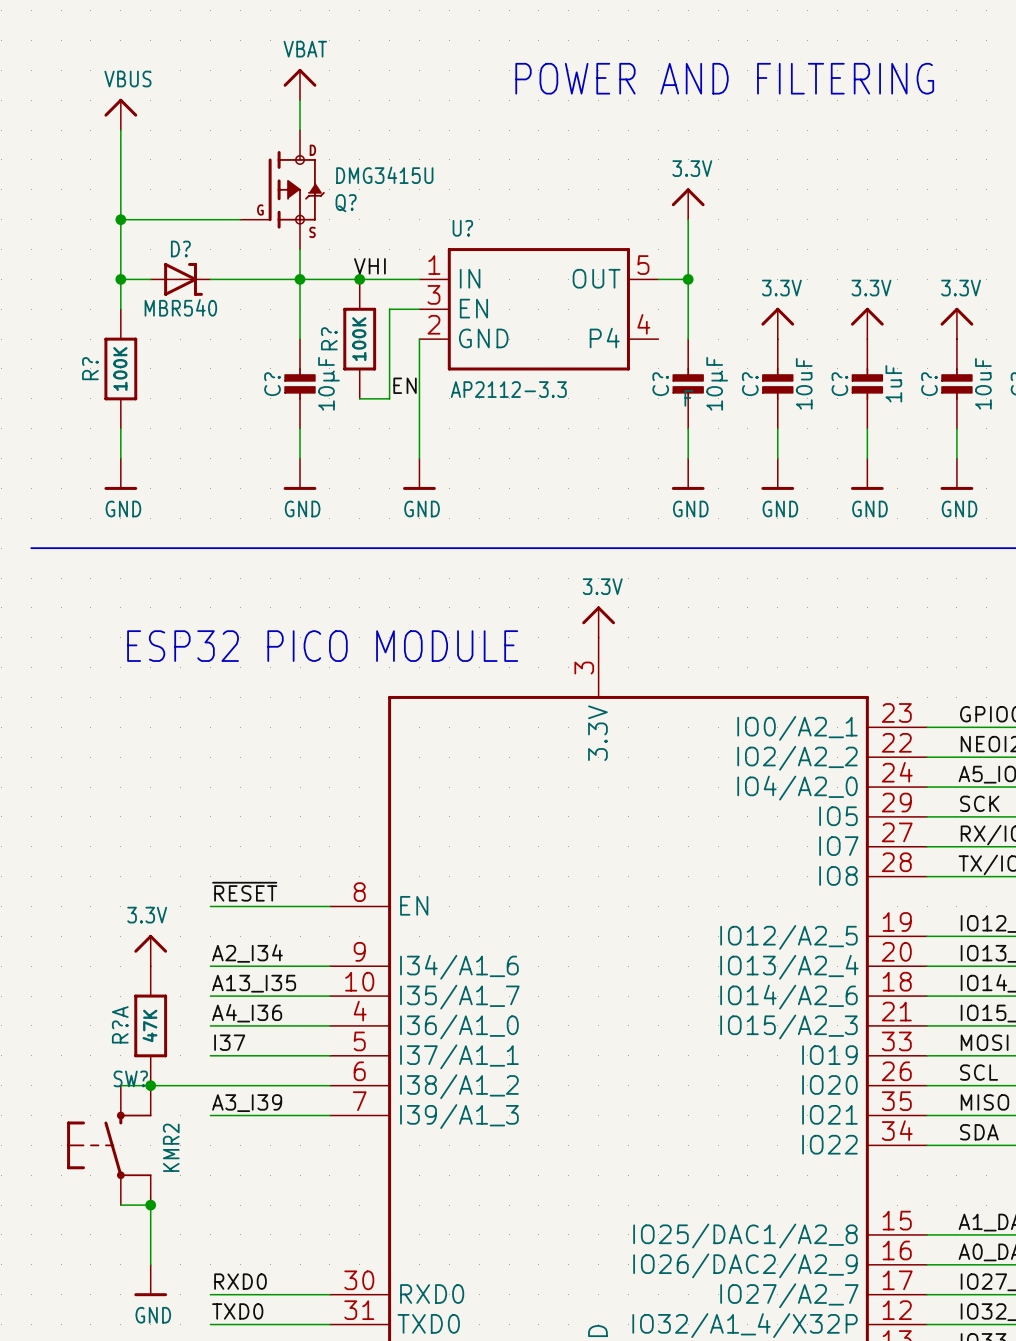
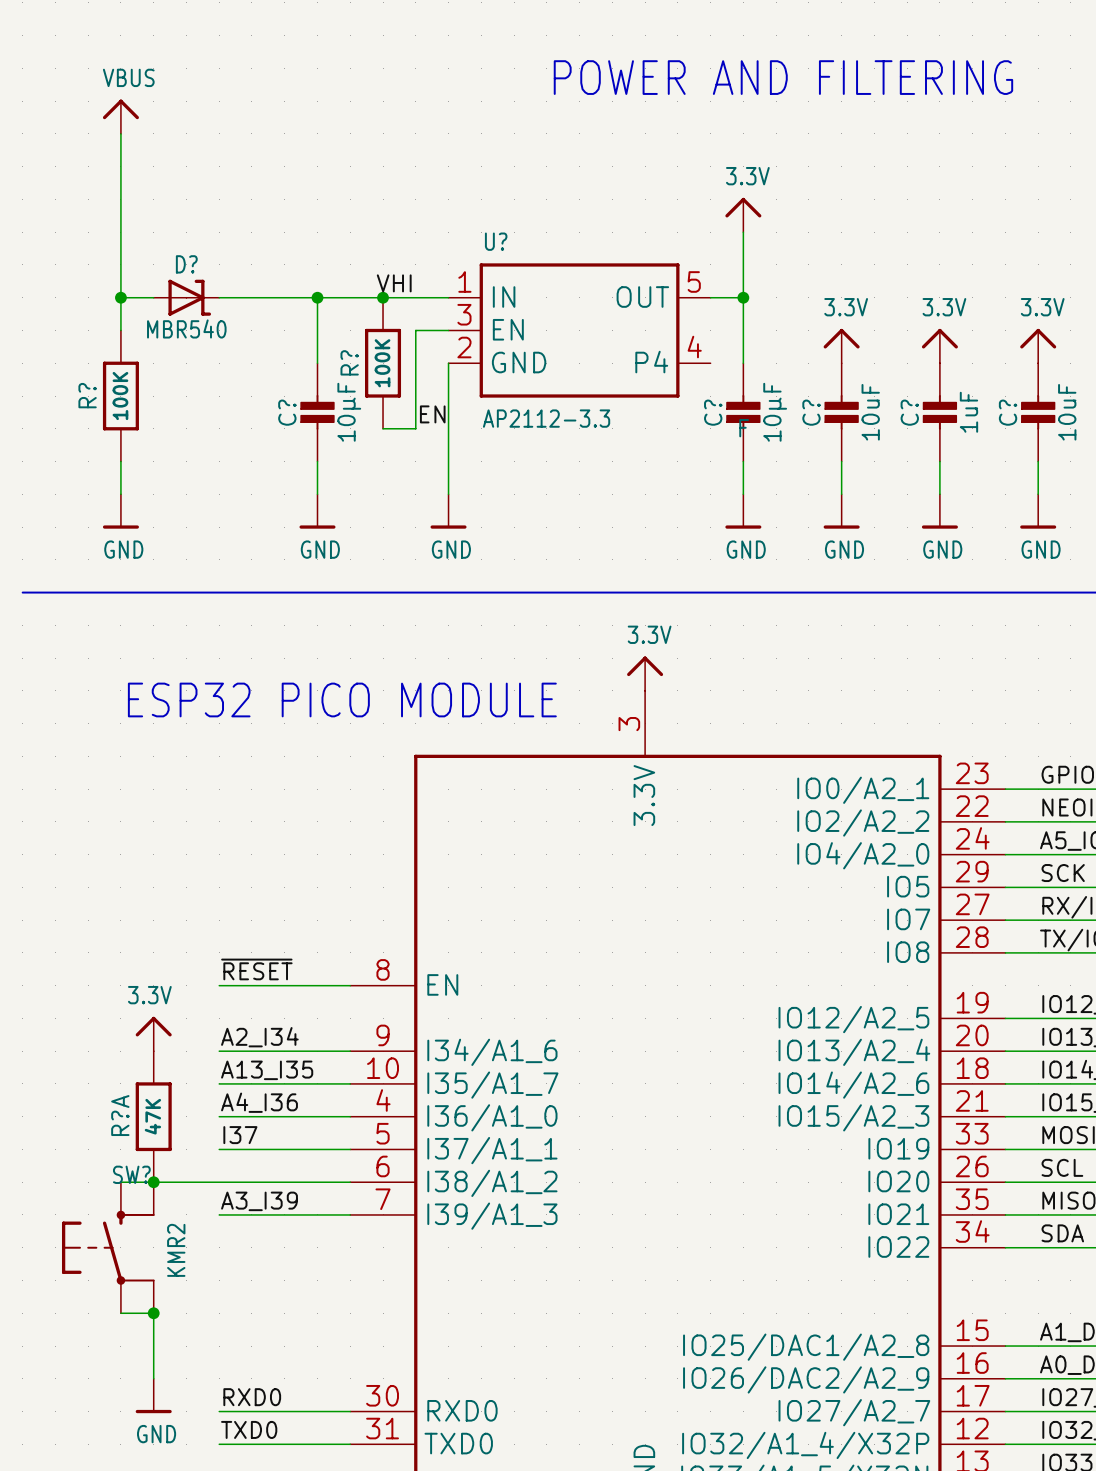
power symbol: VBAT (300, 84) -> none
wire: (300, 100) (300, 130) -> none
Q?: DMG3415U (282, 189) -> none
wire: (120, 219) (240, 219) -> none
junction: (120, 219) -> none
wire: (300, 249) (300, 279) -> none

